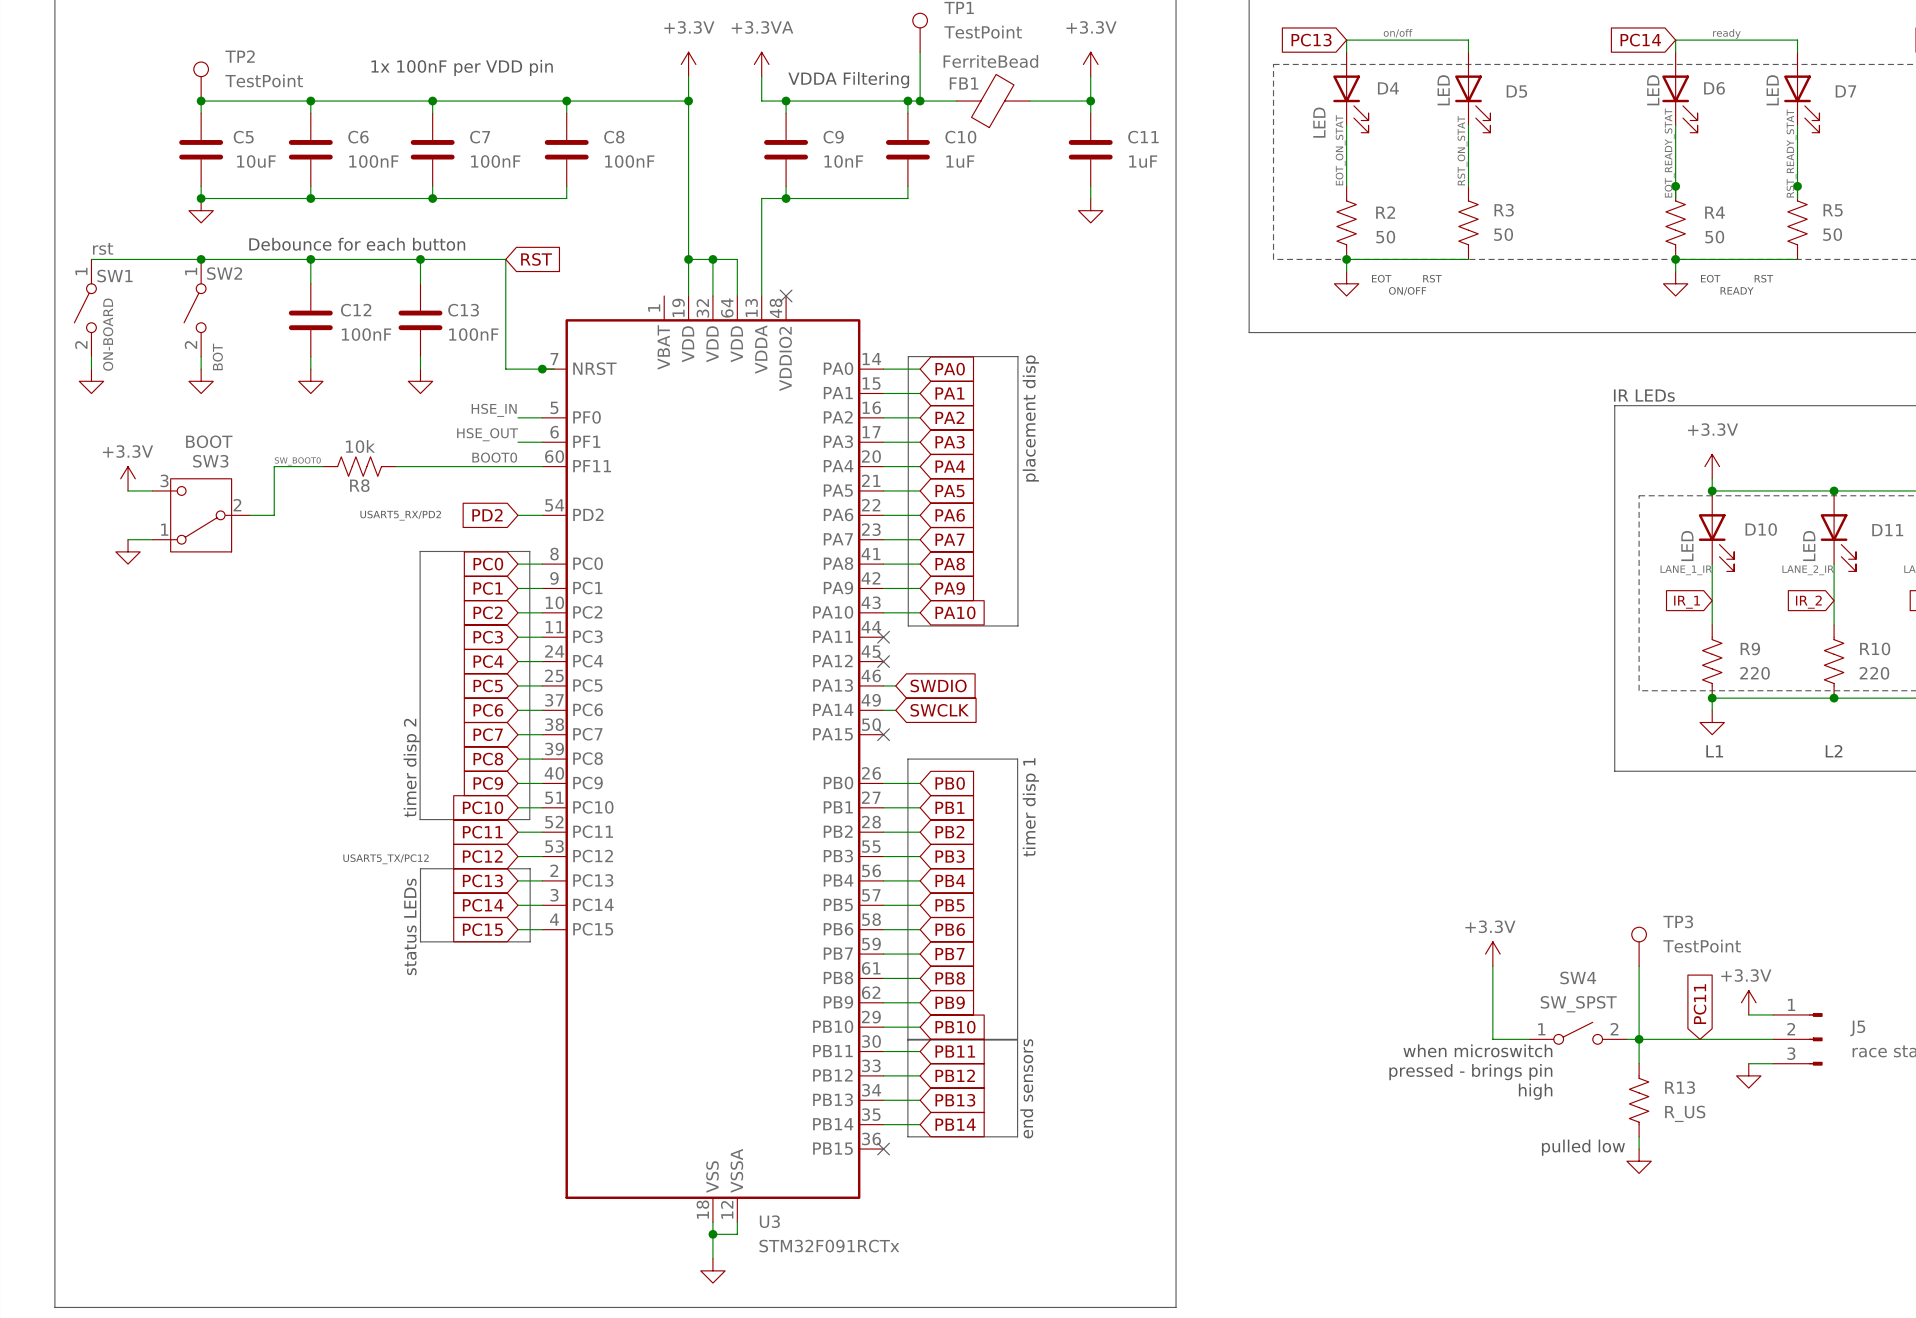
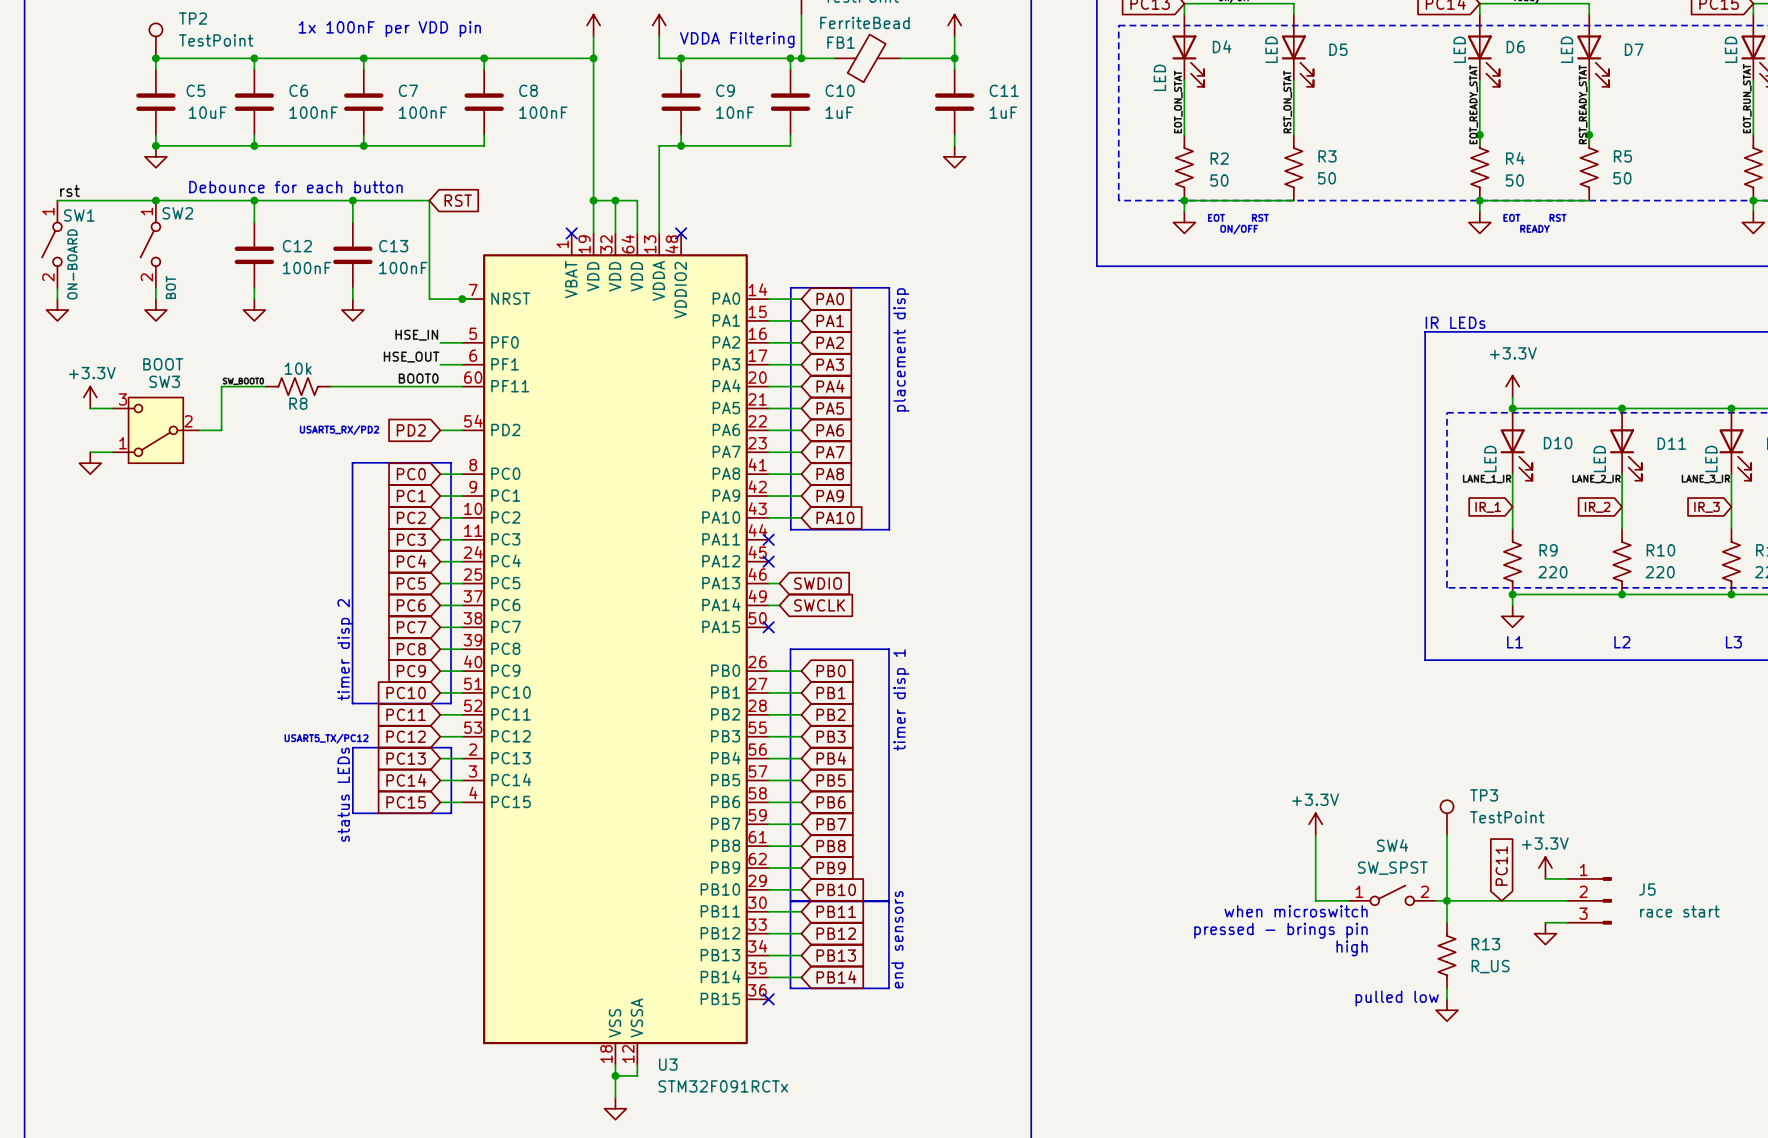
no-connect mark: none -> (571, 233)

